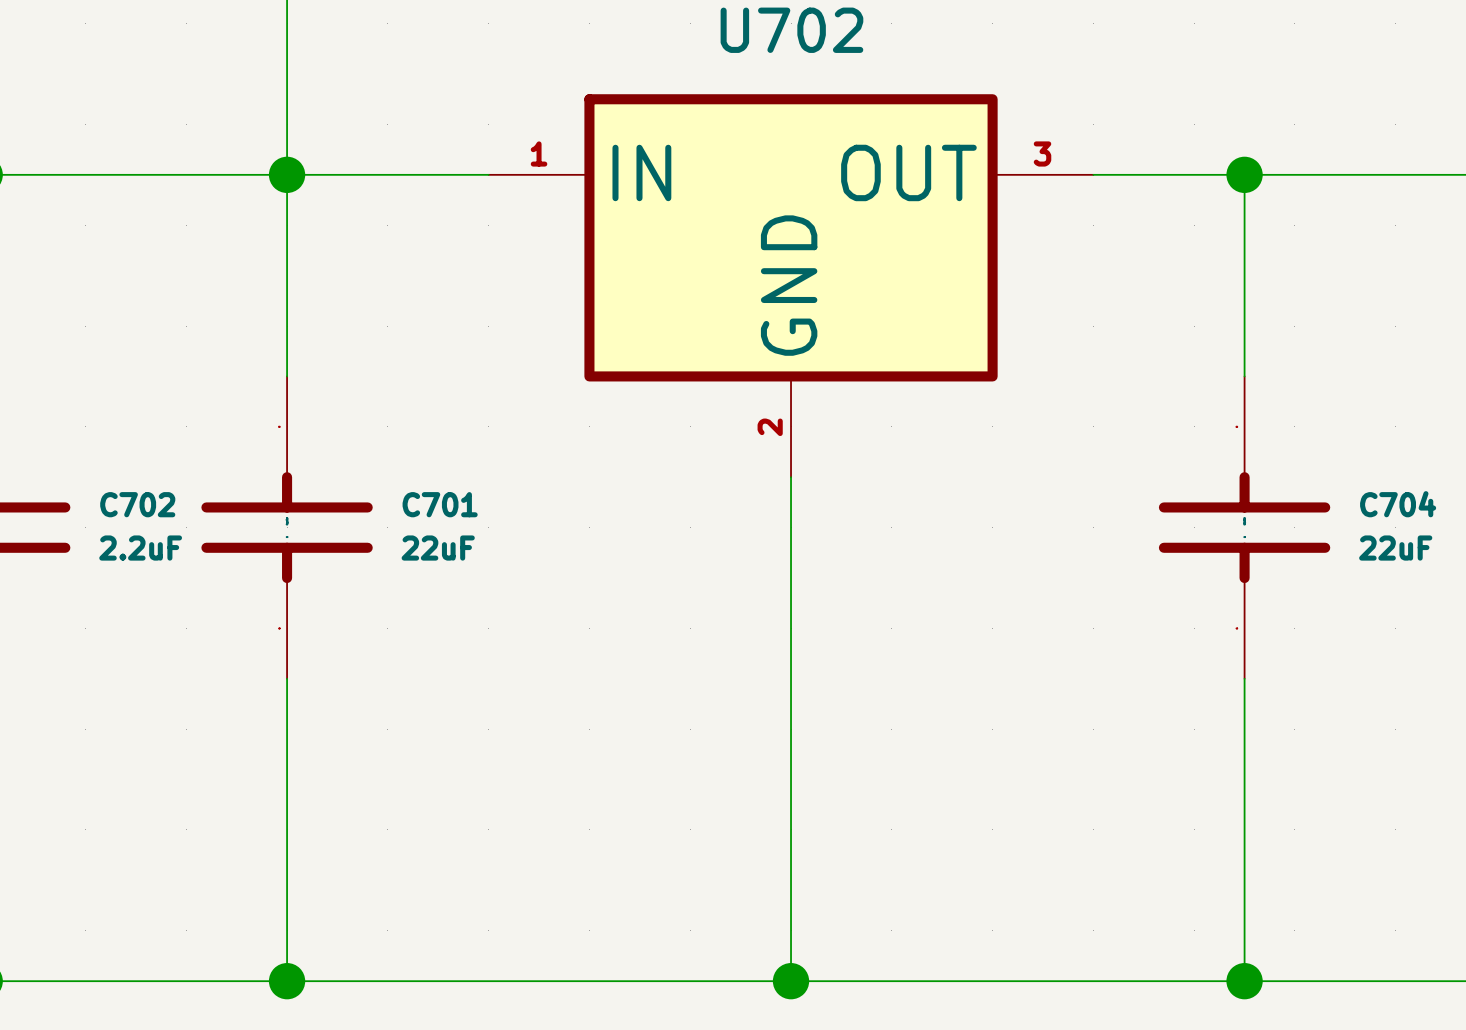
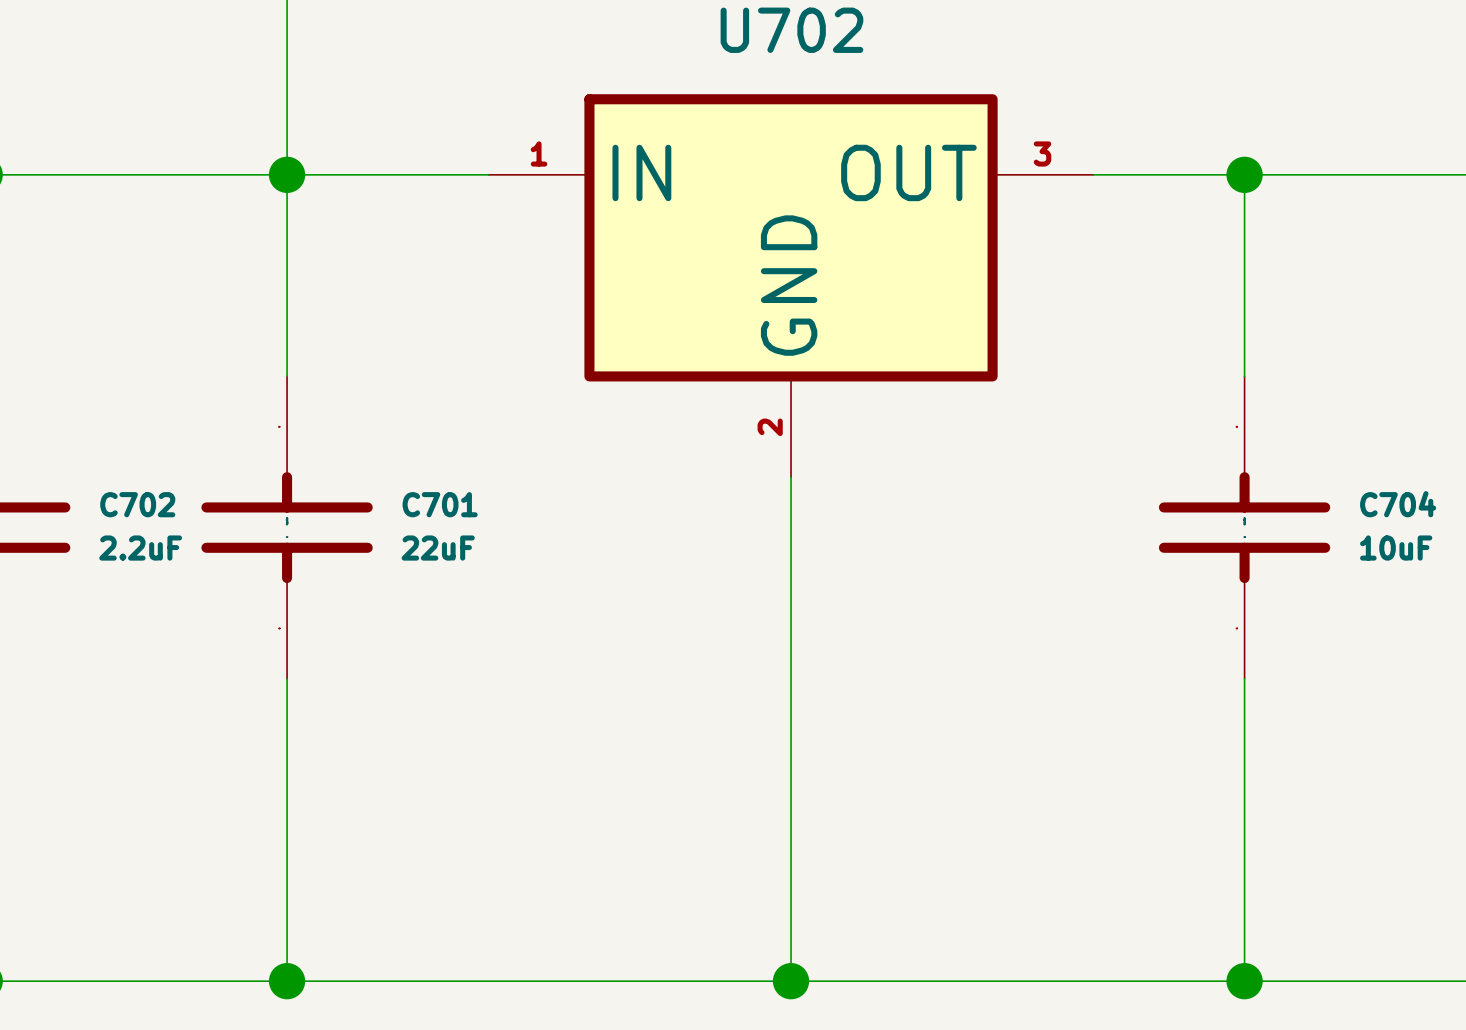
C704 value: 22uF (1395, 548) -> 10uF (1396, 548)

